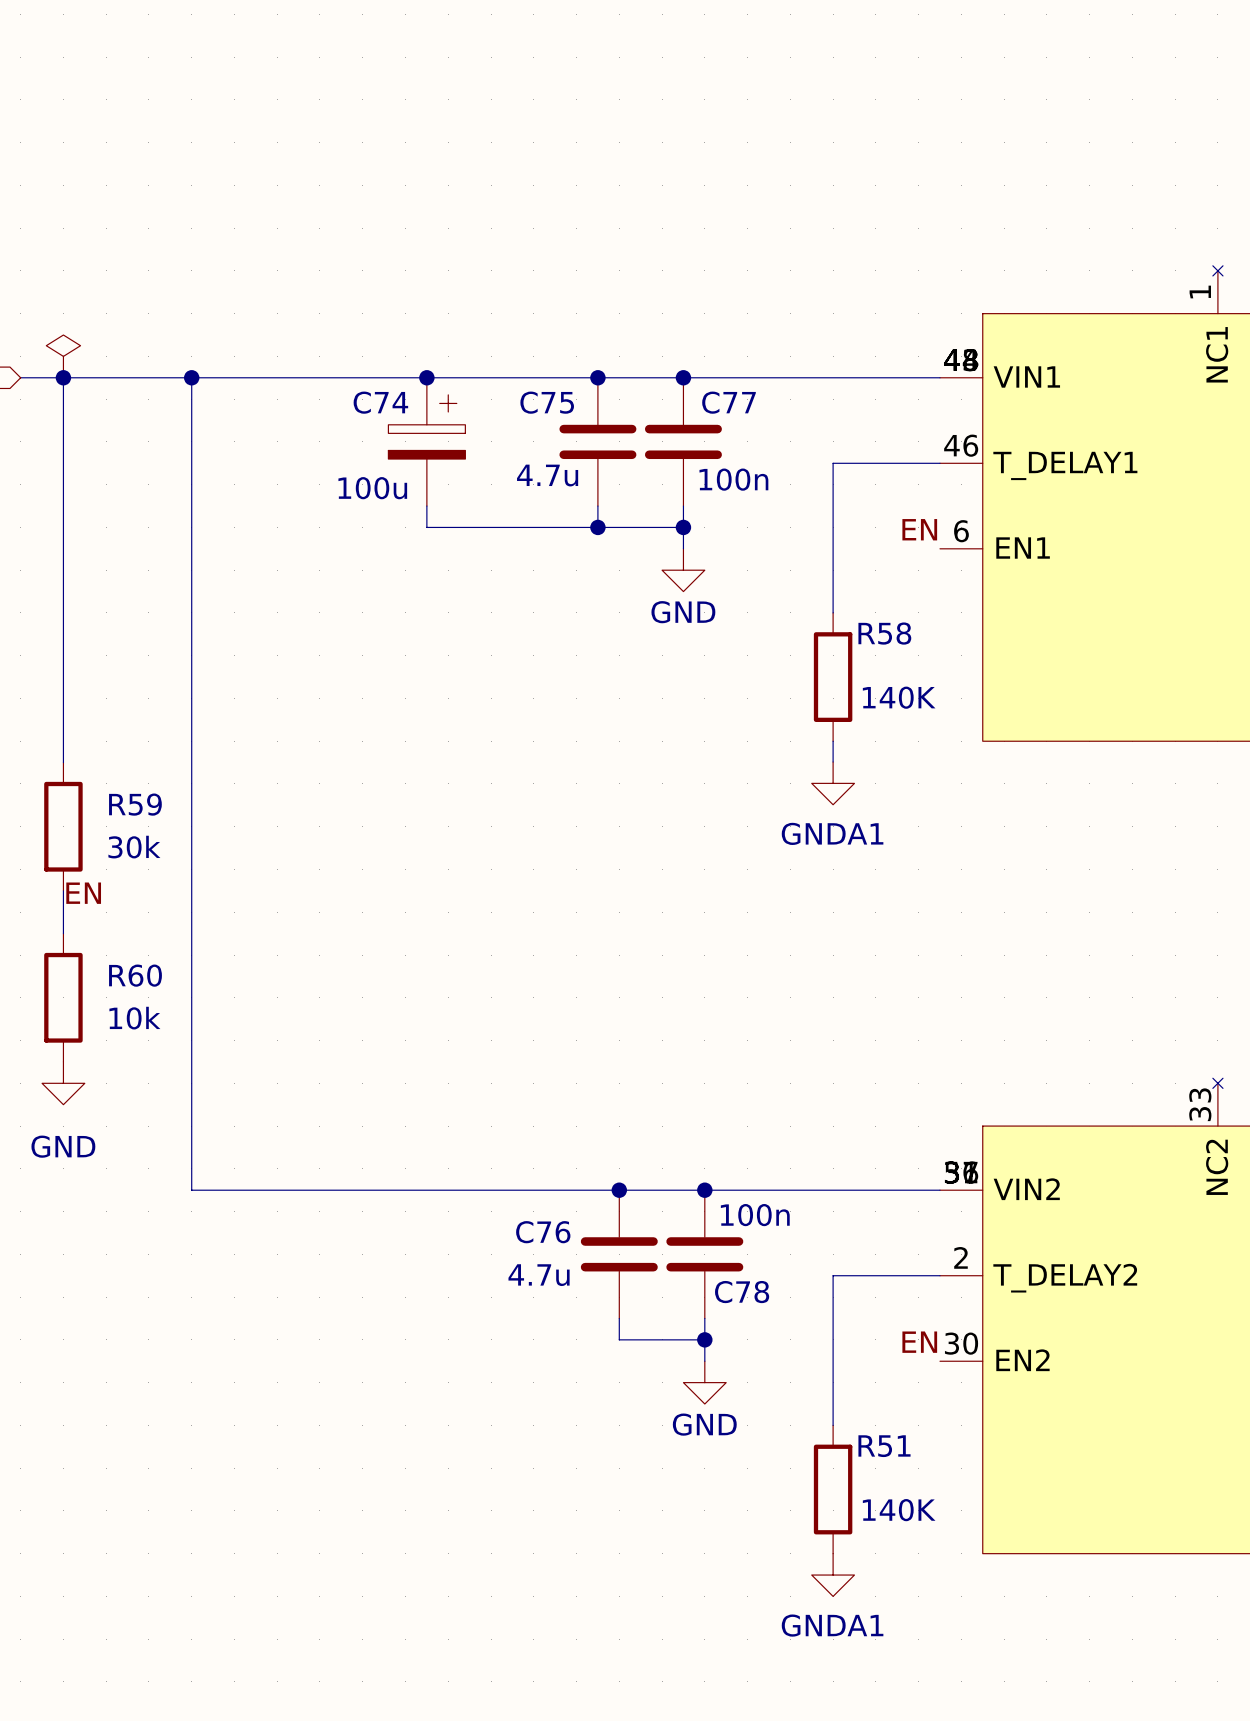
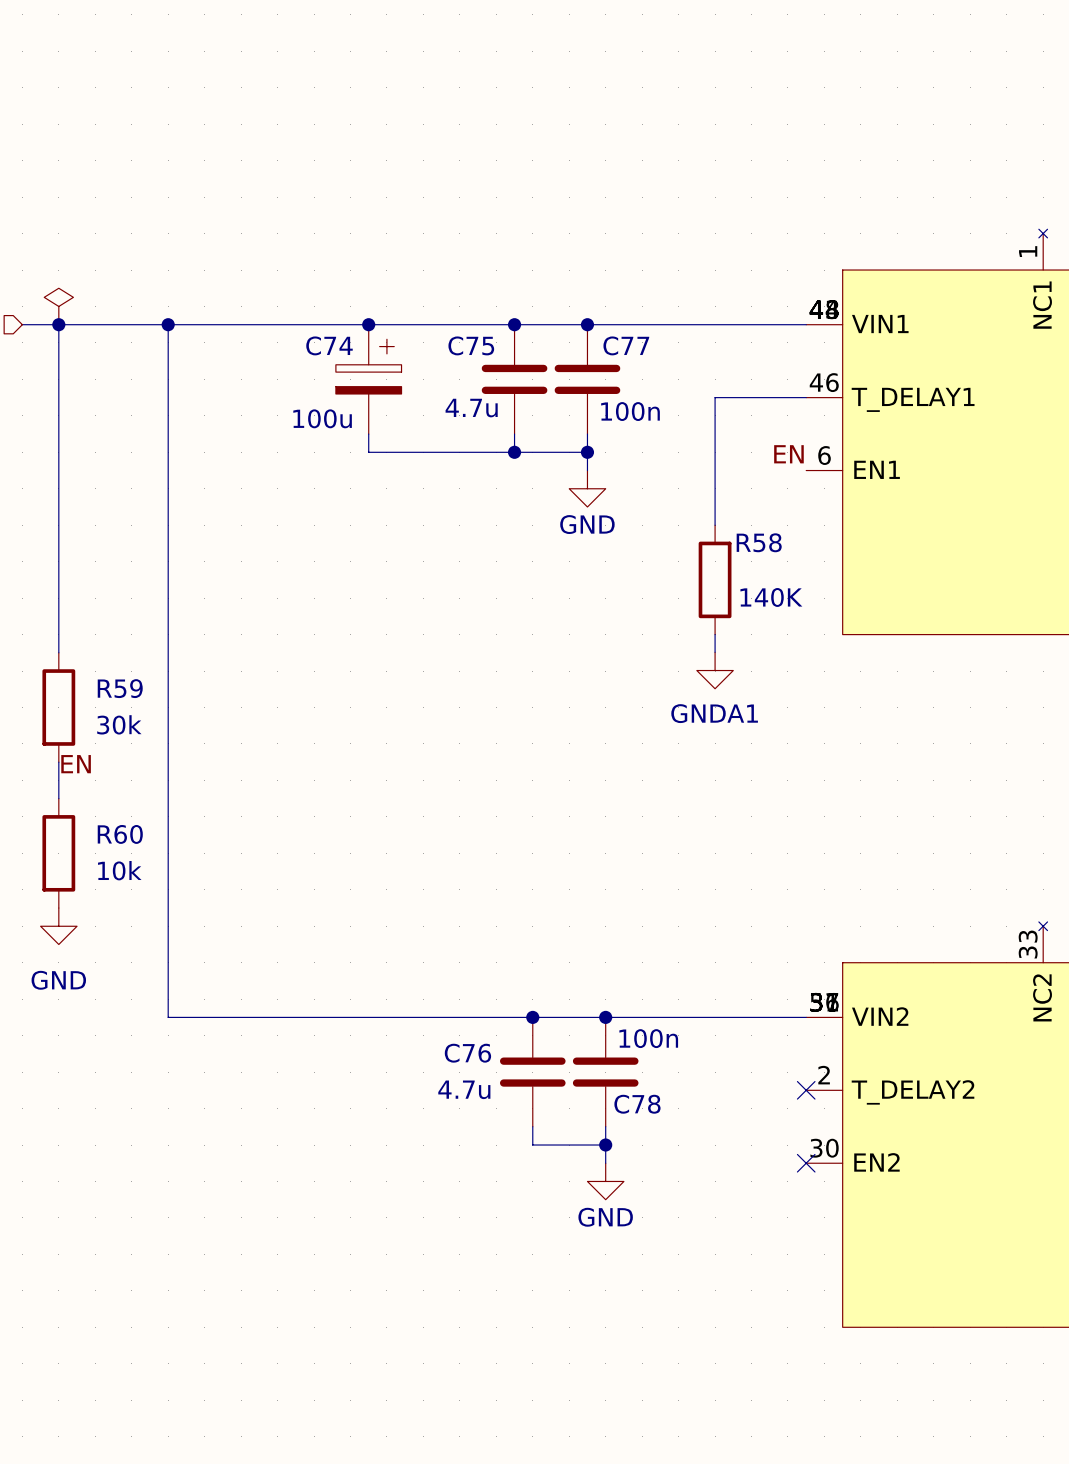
wire: (939, 1275) (833, 1275) (833, 1425) -> none
no-connect mark: none -> (806, 1090)
label: EN (919, 1342) -> none
no-connect mark: none -> (806, 1163)
R51: 140K (833, 1489) -> none
power symbol: GNDA1 (833, 1575) -> none

